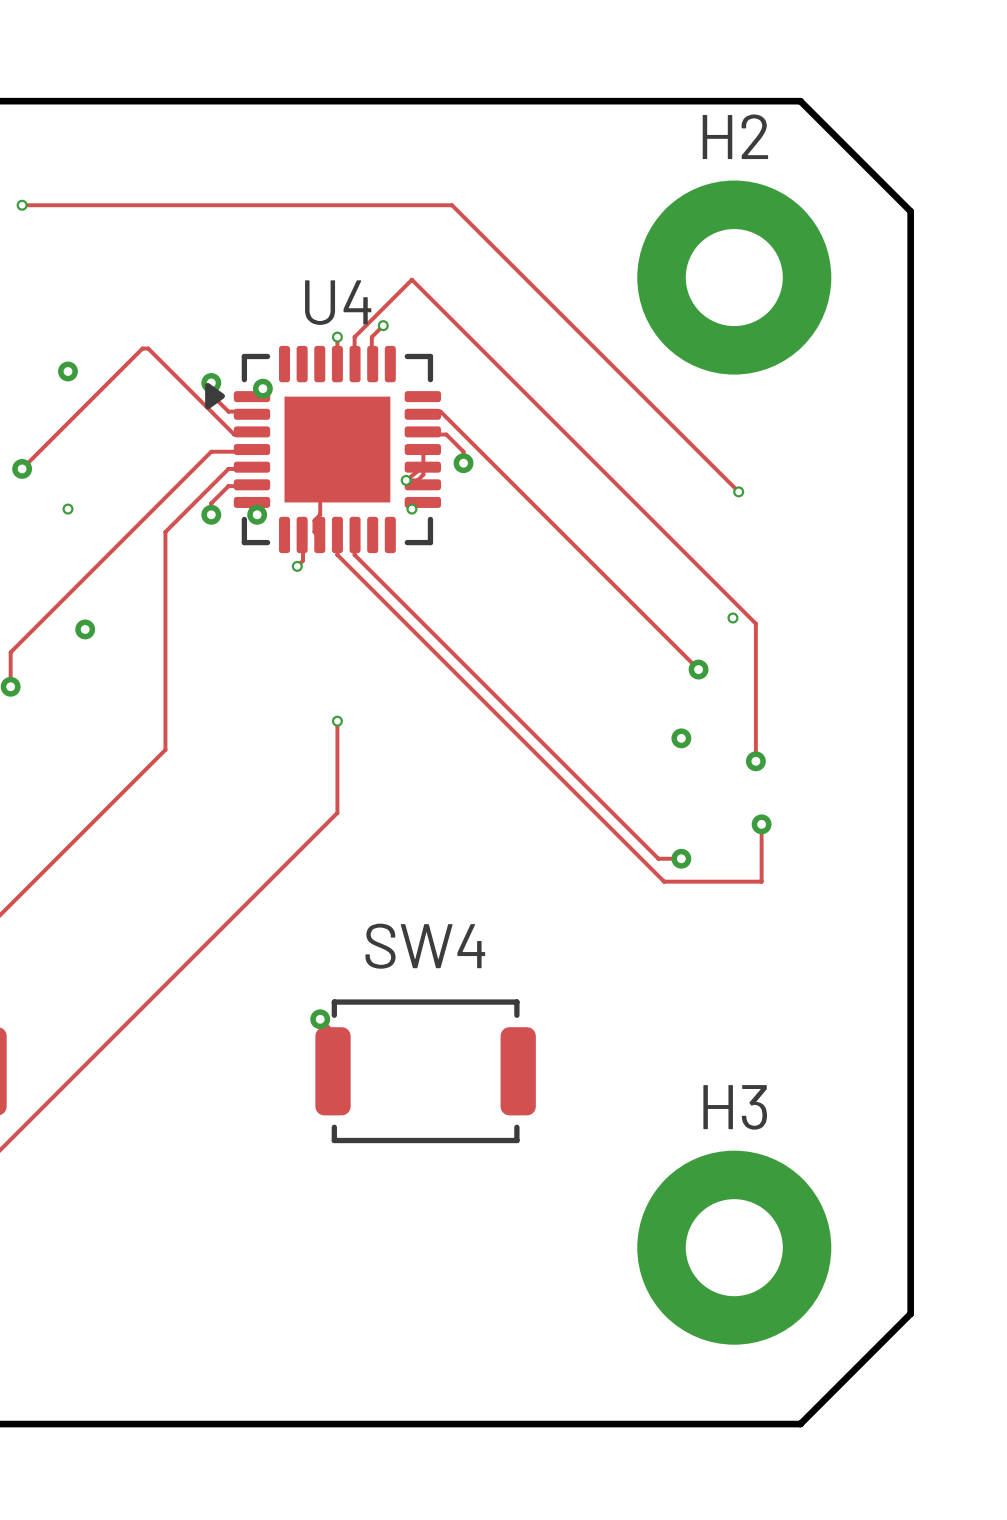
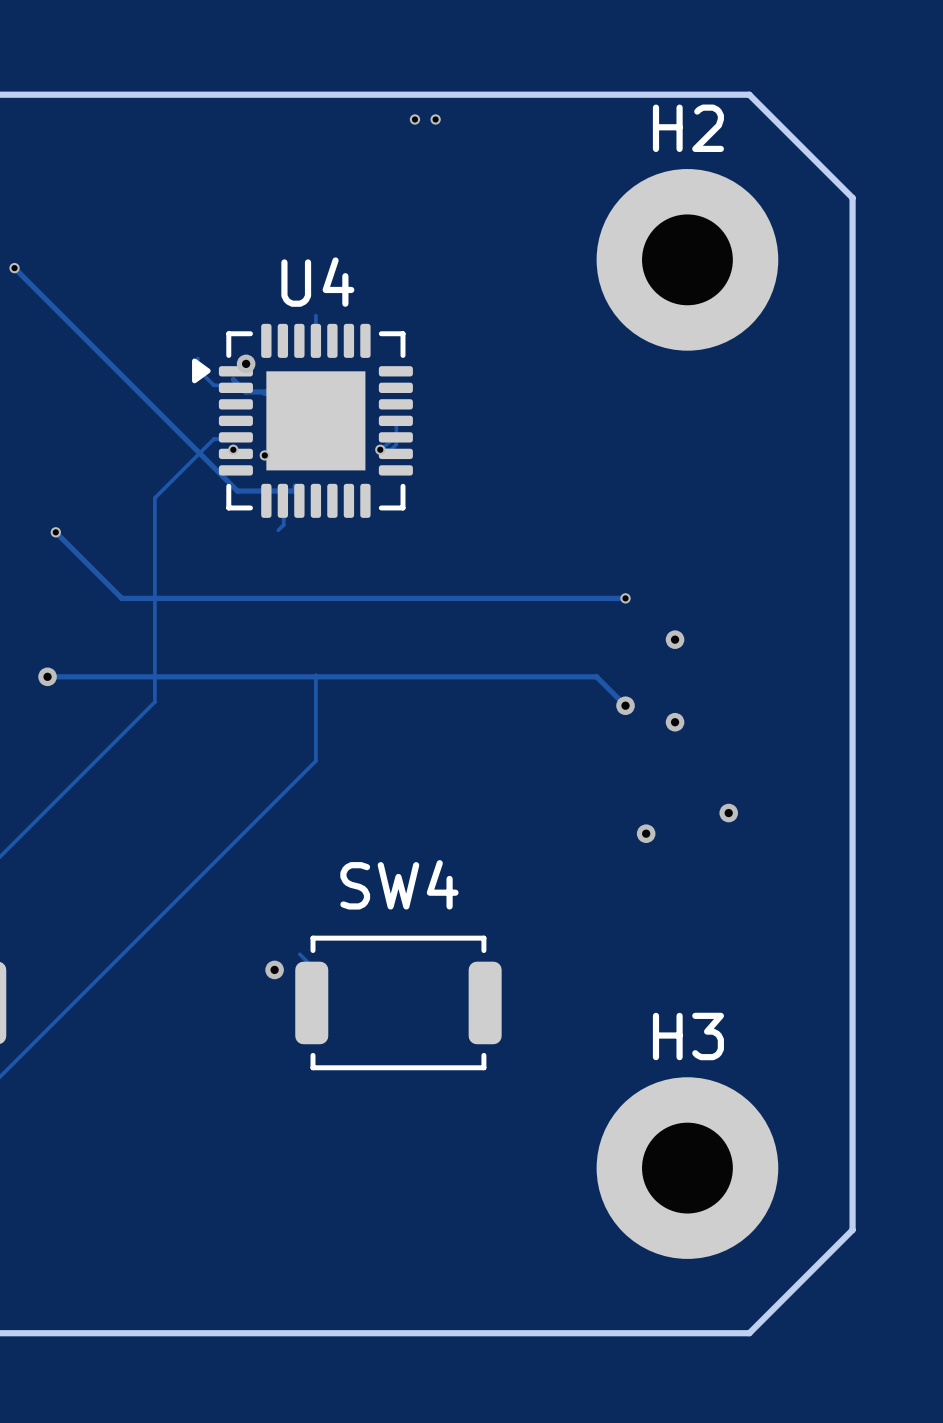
via: none -> (414, 119)
via: none -> (435, 119)
track: (22, 205) (452, 205) (738, 491) -> none
via position: (22, 205) -> (14, 268)
track: none -> (14, 268) (237, 491) (295, 491) (295, 485)
track: (383, 325) (371, 337) (371, 365) (372, 364) -> none
via: (383, 325) -> none
via: (337, 337) -> none
track: (355, 364) (354, 365) (354, 337) (411, 279) (755, 623) (755, 761) -> none
via: (67, 371) -> none
via: (211, 382) -> none
track: none -> (233, 379) (245, 391) (266, 391) (264, 393)
track: (422, 414) (423, 411) (440, 411) (698, 669) -> none
track: (251, 431) (251, 434) (234, 434) (148, 348) (142, 348) (22, 468) -> none
track: (422, 431) (423, 434) (446, 434) (463, 451) (463, 463) -> none
track: (251, 449) (251, 451) (211, 451) (10, 652) (10, 686) -> none
via: (463, 463) -> none
via: (22, 468) -> none
via: none -> (233, 449)
track: (251, 484) (228, 486) (211, 503) (211, 514) -> none
via: none -> (264, 455)
via: (738, 491) -> none
track: (317, 496) (320, 497) (320, 514) (314, 520) (314, 531) (320, 537) (319, 534) -> none
via position: (67, 509) -> (55, 532)
via: (411, 509) -> none
via: (211, 514) -> none
via: (257, 514) -> none
track: (337, 534) (337, 554) (664, 881) (761, 881) (761, 824) -> none
track: (355, 534) (354, 554) (658, 858) (681, 858) -> none
via: (297, 566) -> none
track: none -> (55, 532) (121, 598) (625, 598)
via position: (732, 617) -> (625, 598)
via: (85, 629) -> none
via position: (698, 669) -> (675, 639)
via: (10, 686) -> none
via: (337, 721) -> none
track: none -> (47, 676) (596, 676) (625, 705)
via: none -> (47, 676)
via position: (681, 738) -> (625, 705)
via: (755, 761) -> none
via: none -> (675, 722)
via: (761, 824) -> none
via position: (681, 858) -> (646, 833)
via: none -> (728, 813)
via position: (320, 1019) -> (274, 969)

